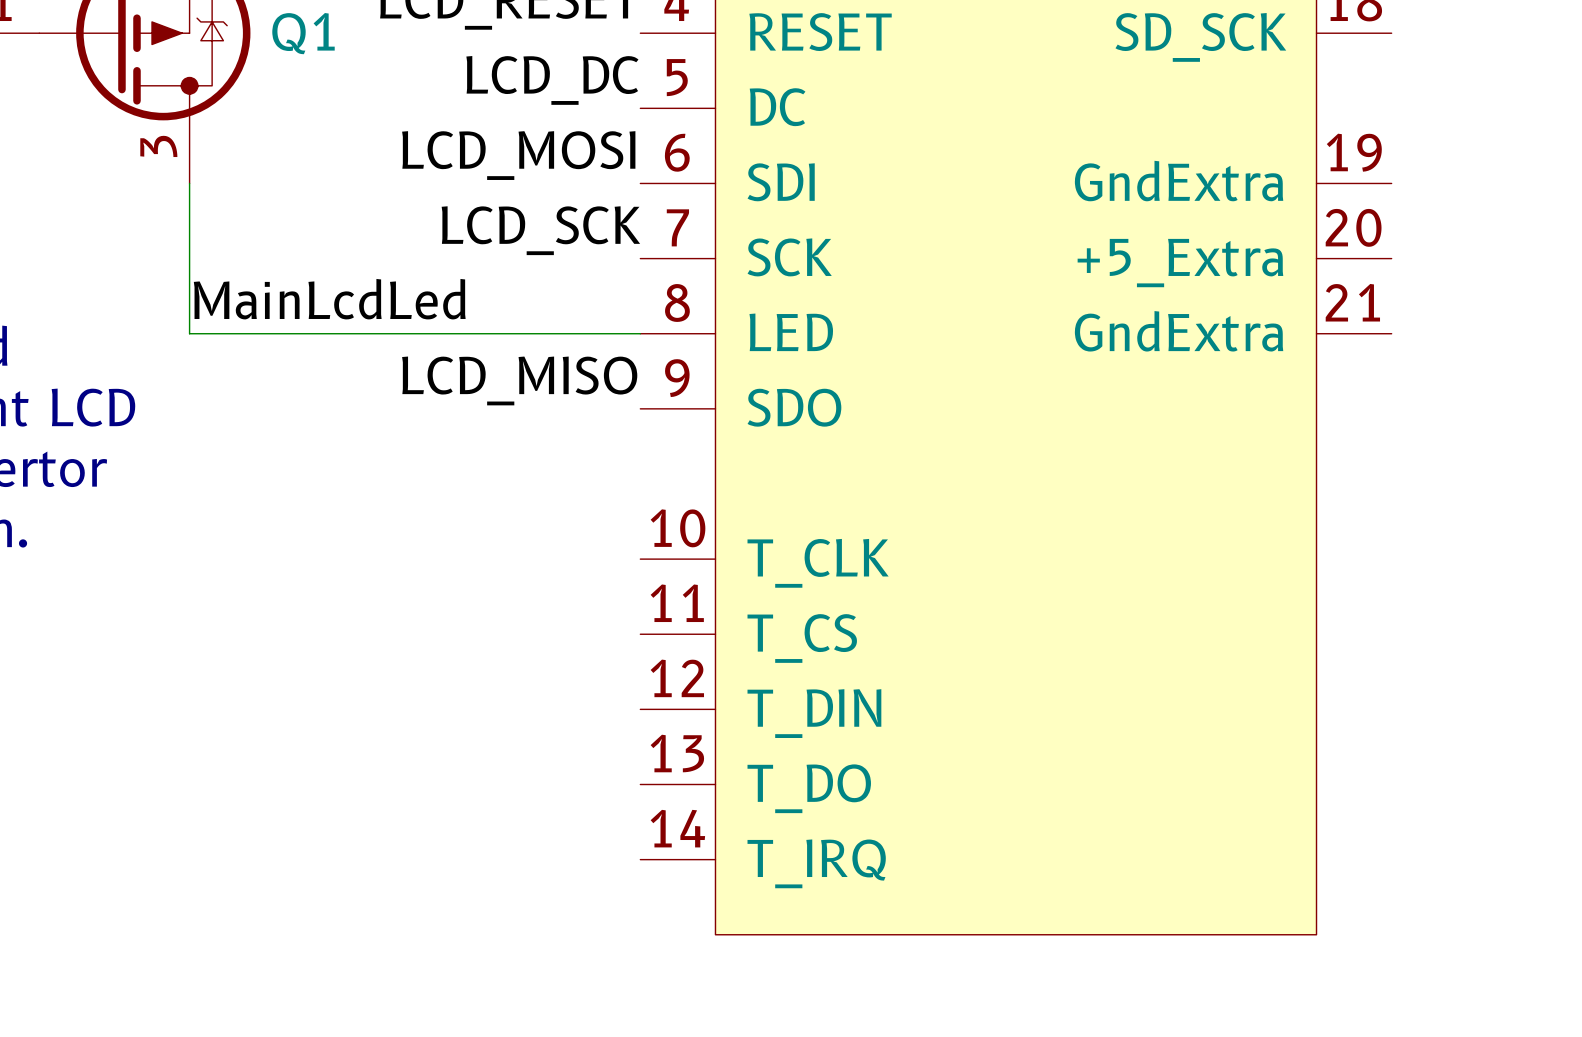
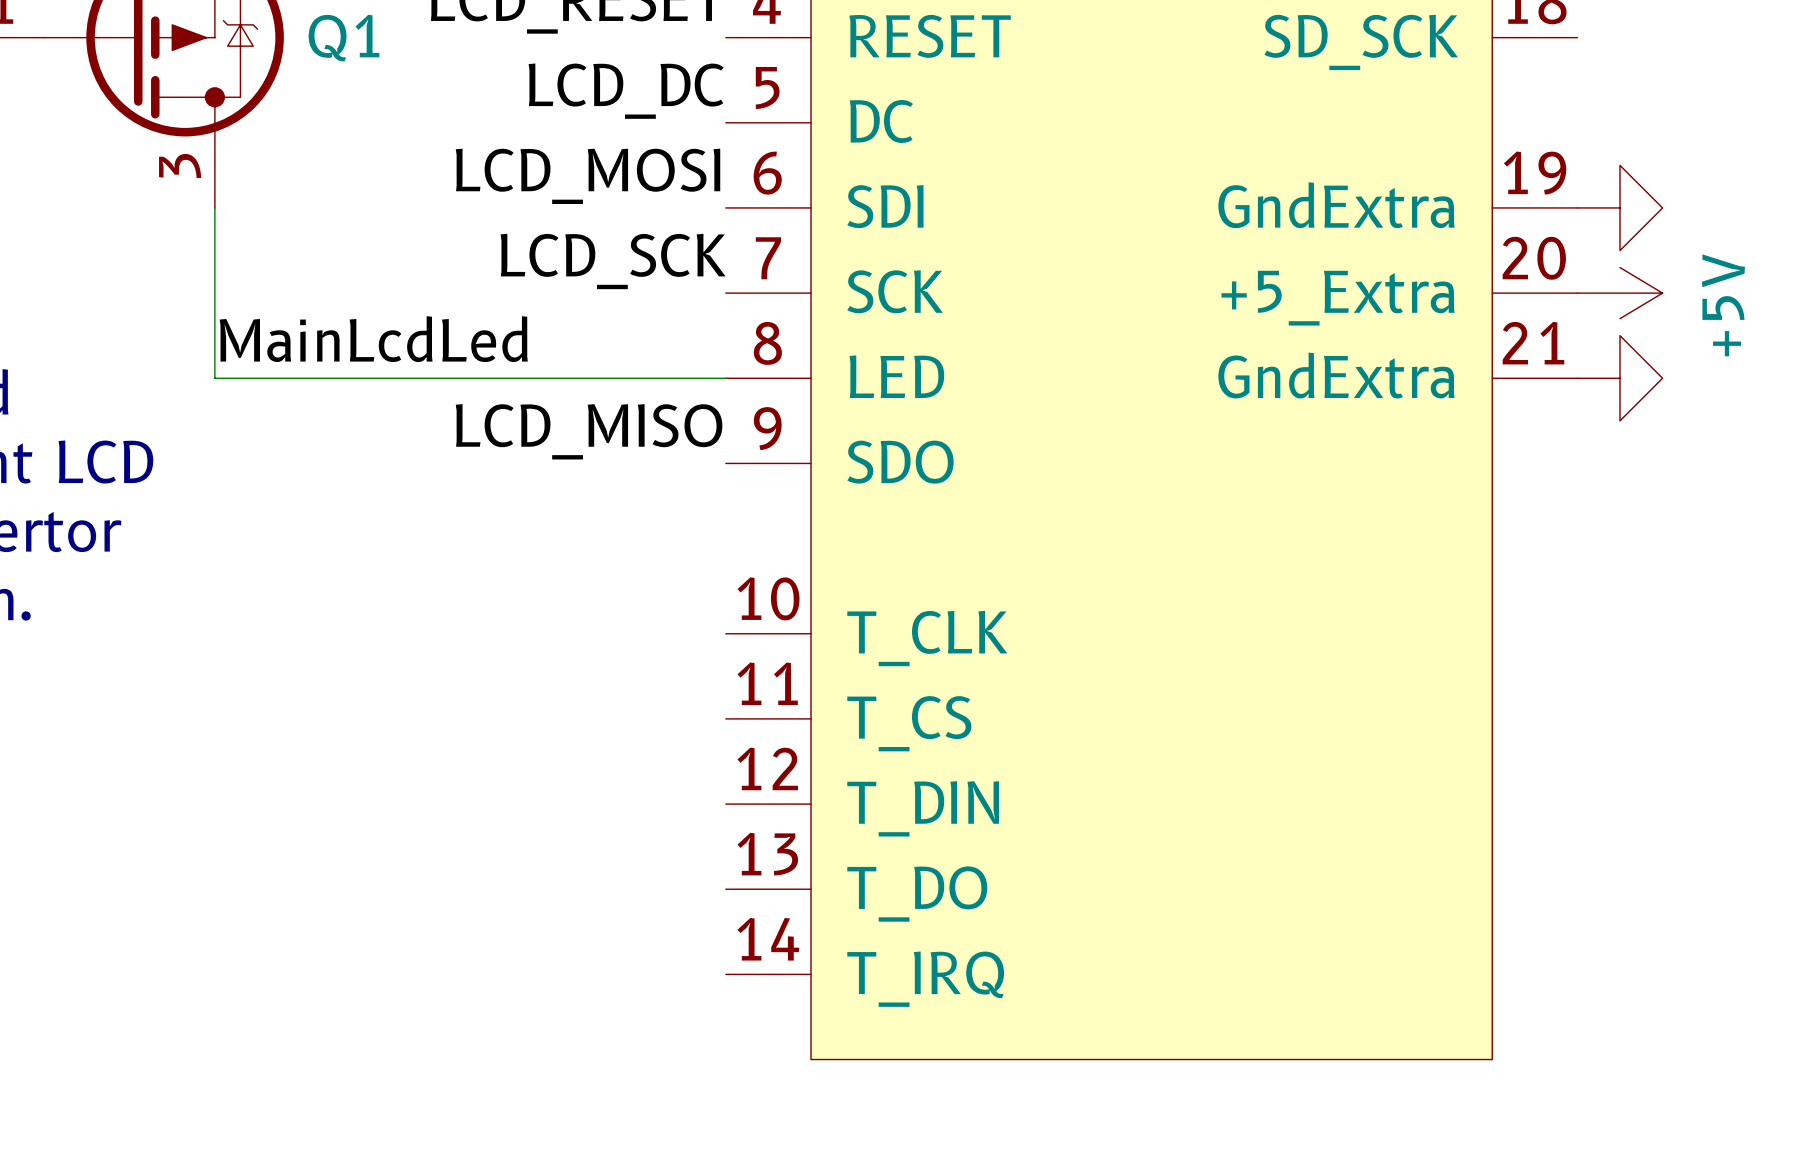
power symbol: none -> (1620, 207)
power symbol: none -> +5V (1620, 293)
power symbol: none -> (1620, 378)

